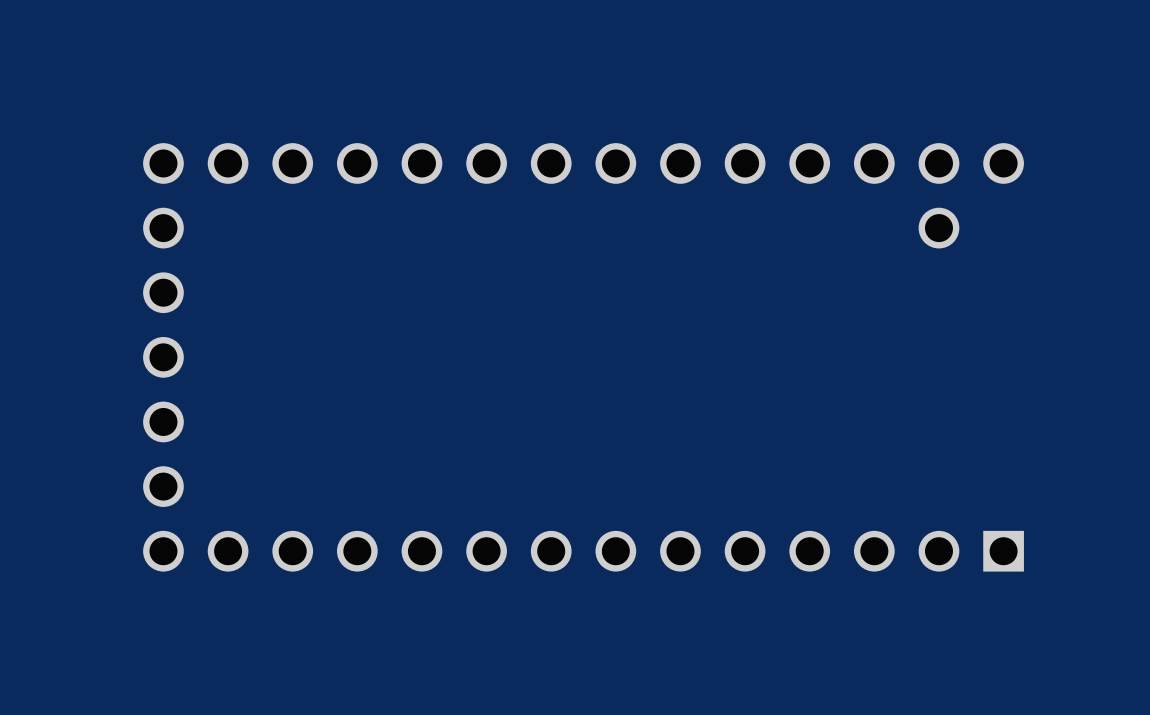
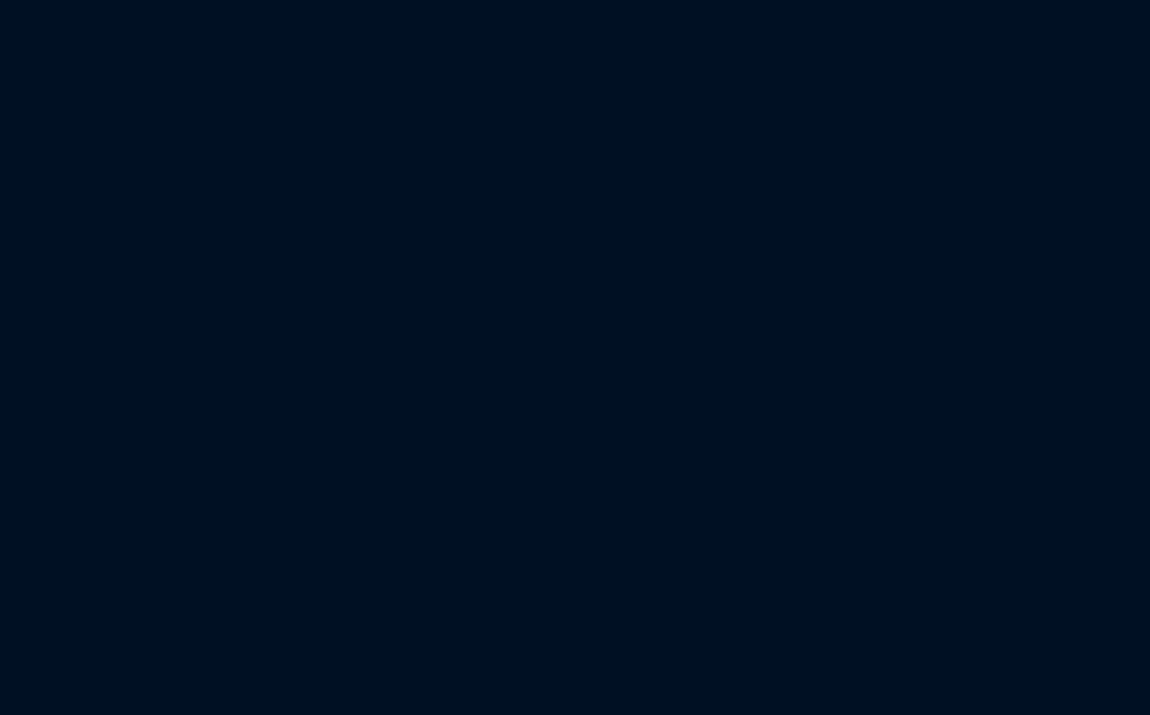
part: (583, 357) -> none

